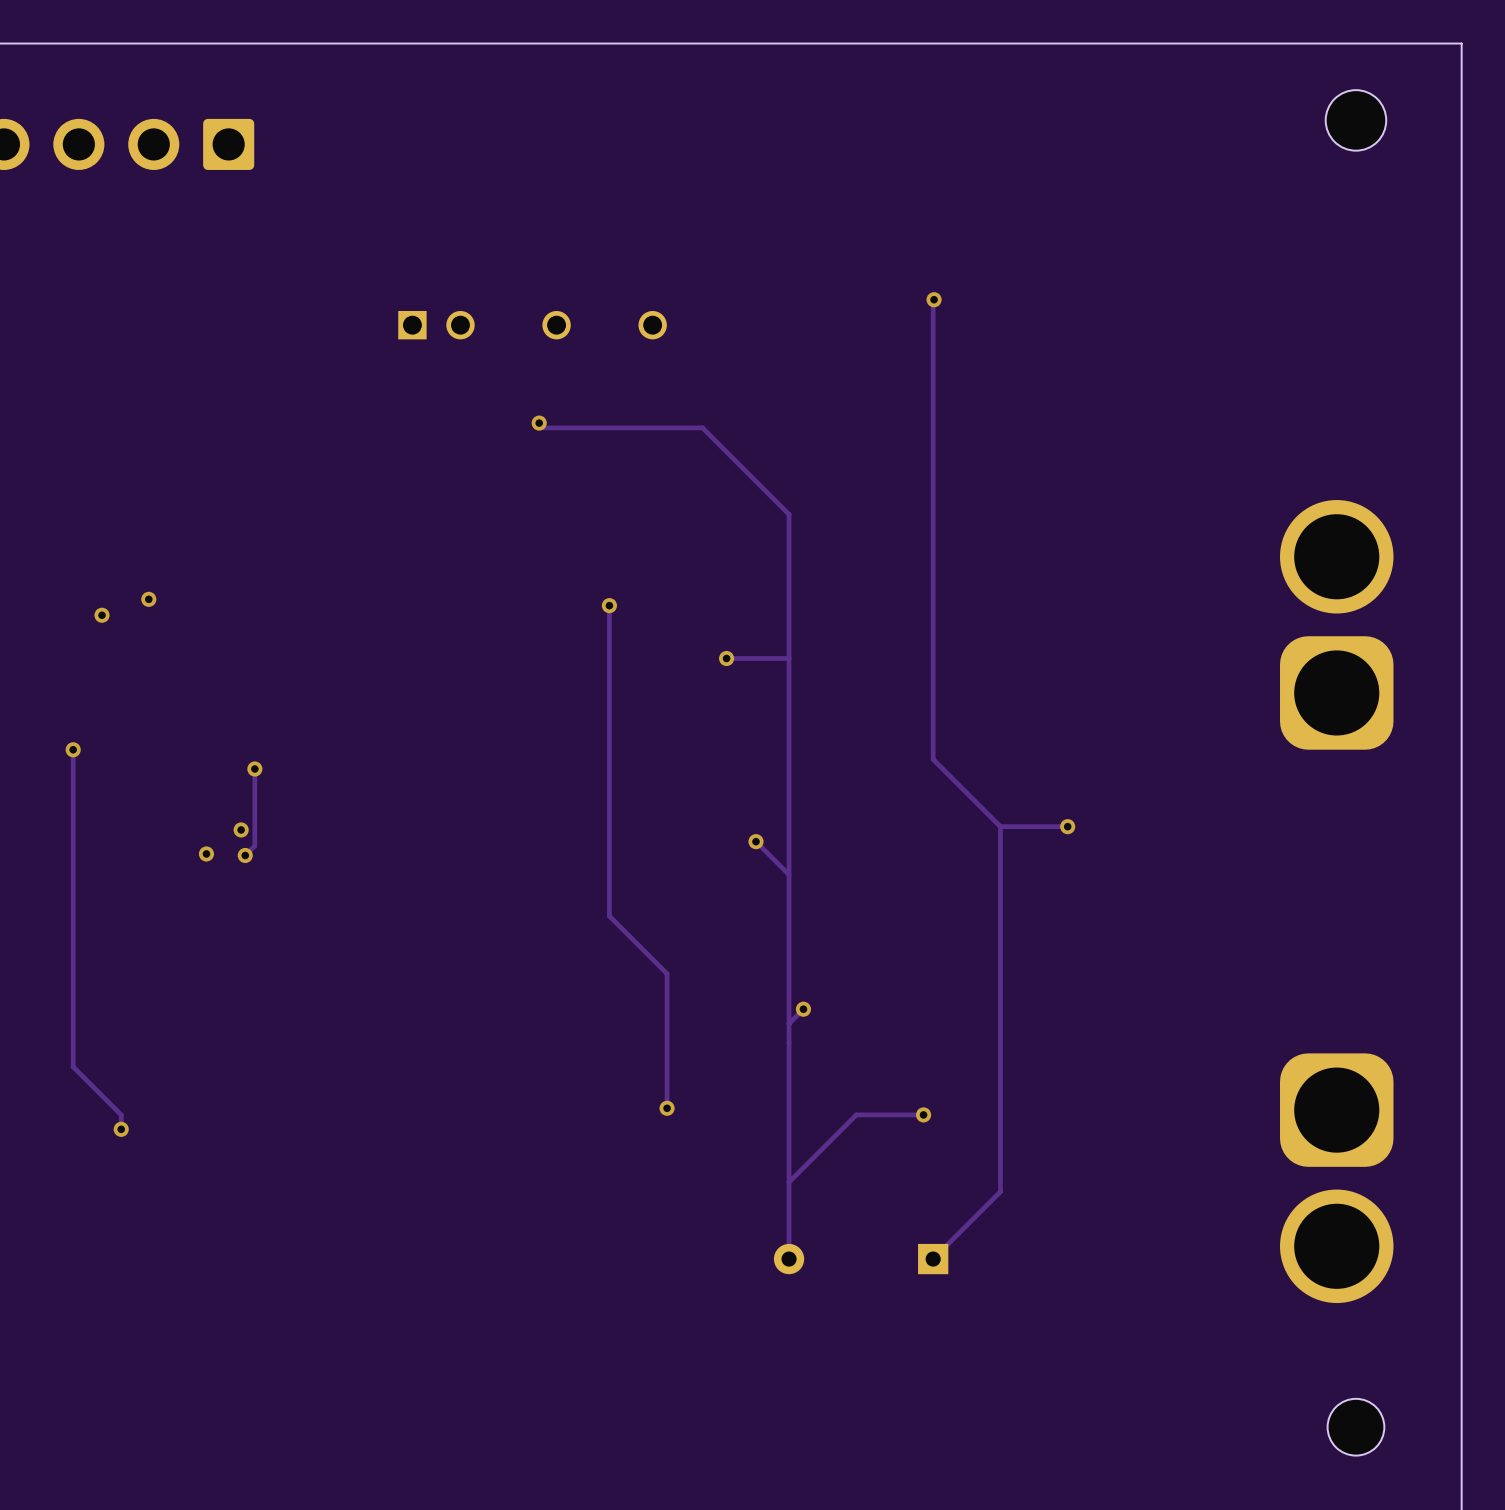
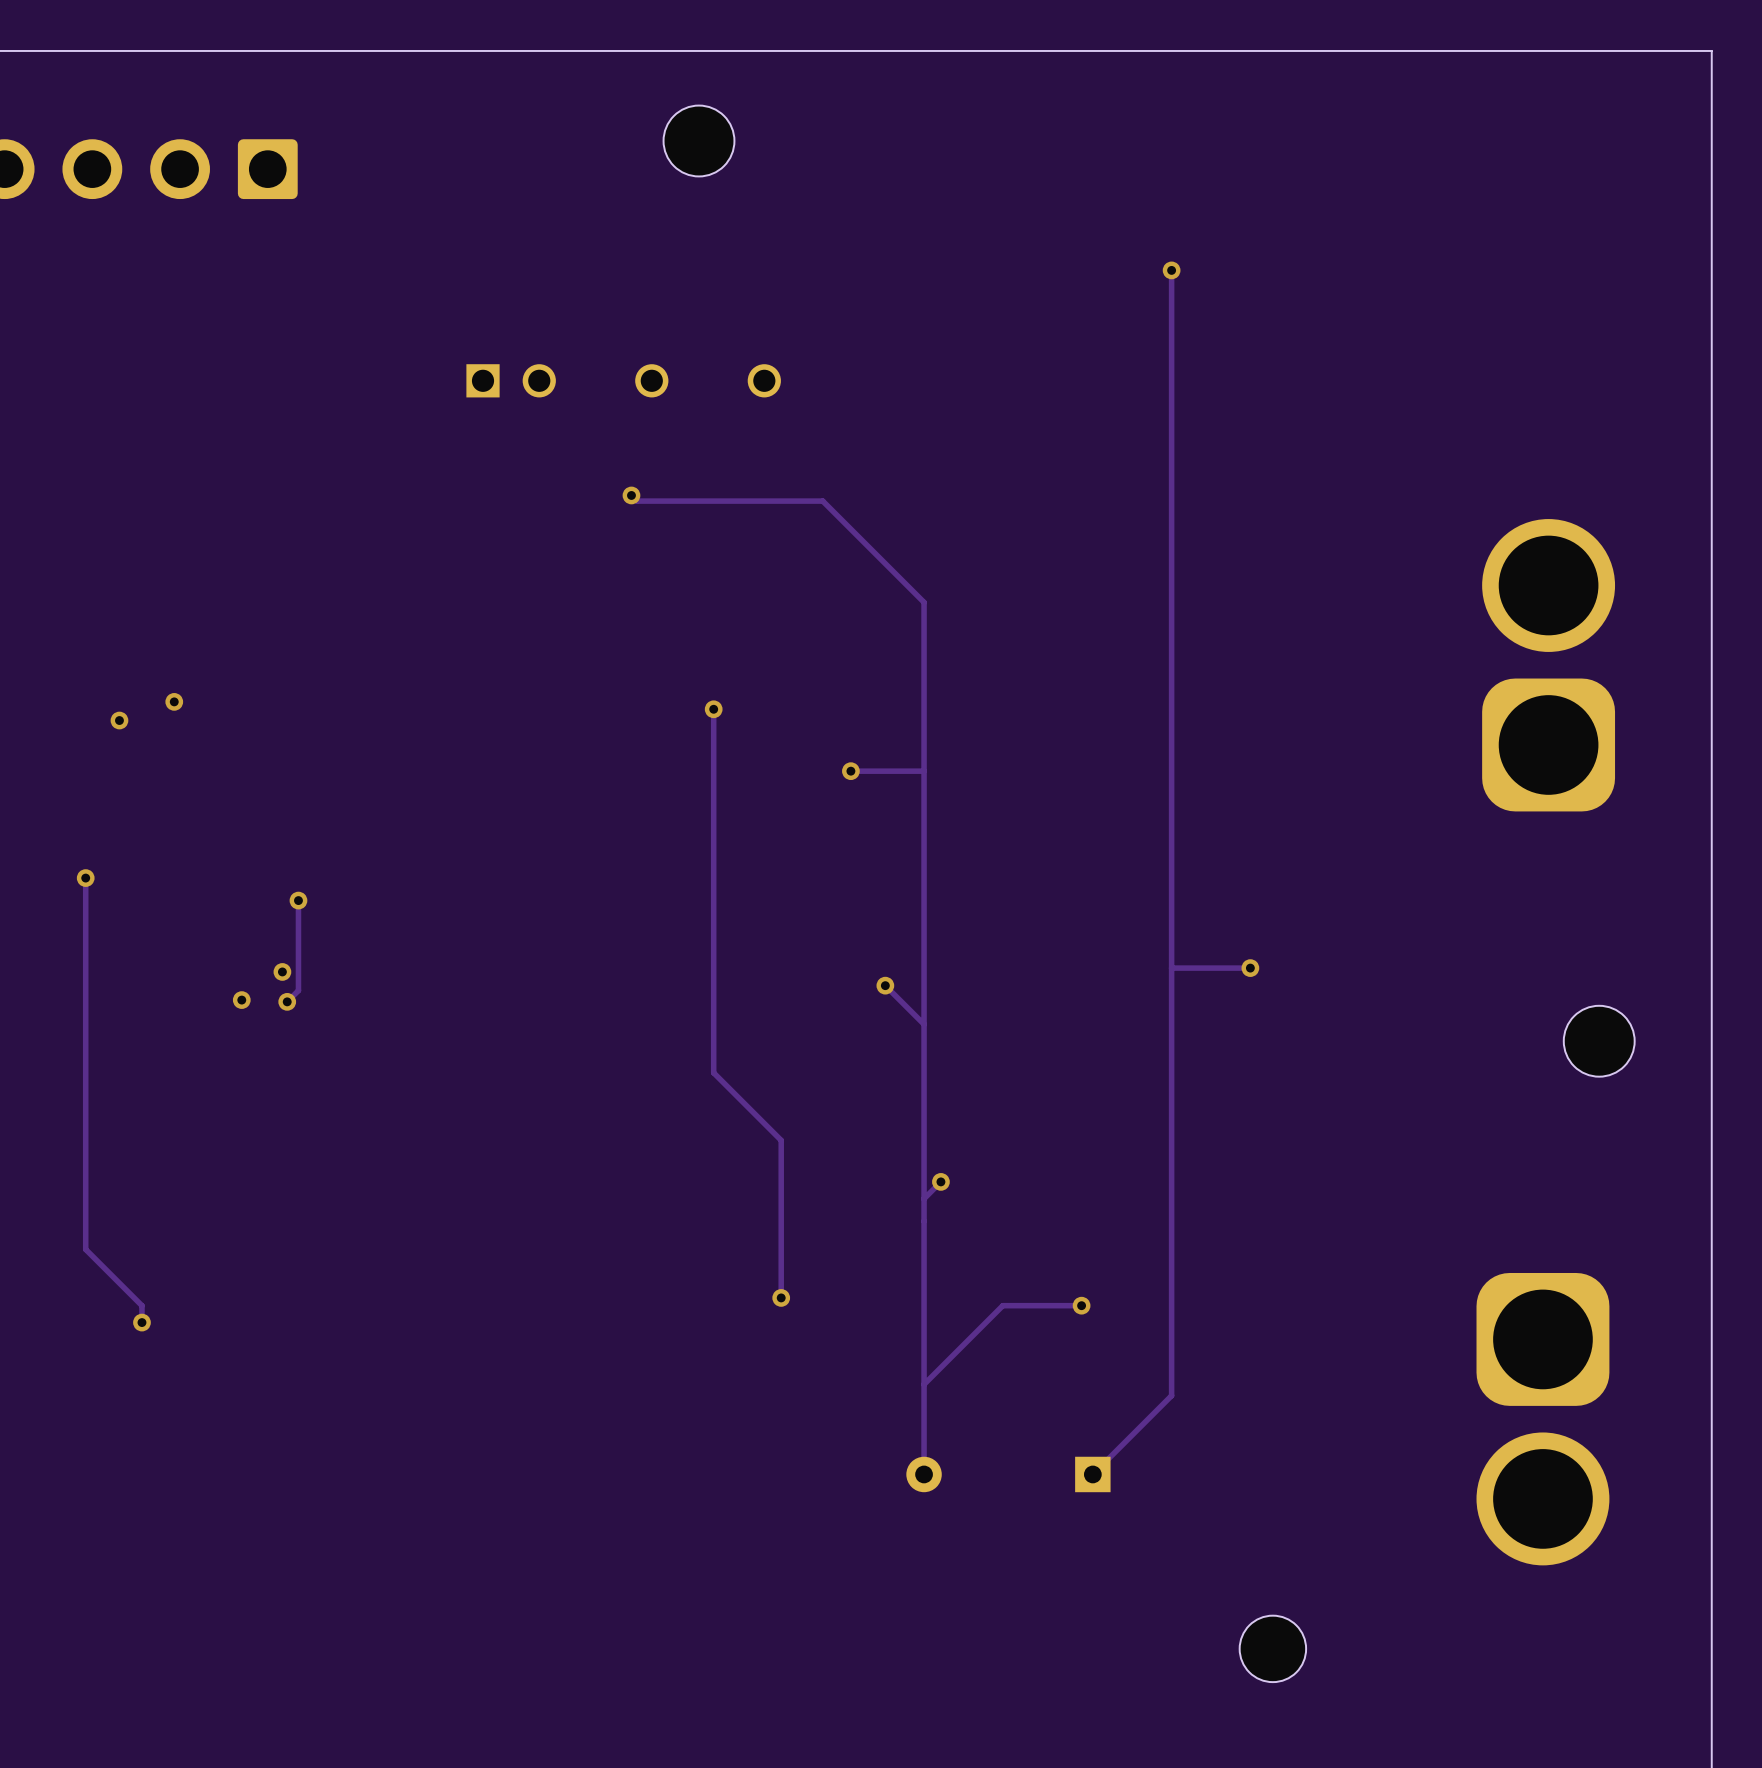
part: none -> (698, 141)
part: (1355, 120) -> none
track: (933, 298) (933, 759) (1000, 826) -> (1171, 270) (1171, 968)
via position: (934, 299) -> (1171, 270)
part position: (1336, 624) -> (1548, 665)
part: none -> (1599, 1041)
part position: (1336, 1178) -> (1542, 1419)
part position: (1355, 1427) -> (1272, 1648)

